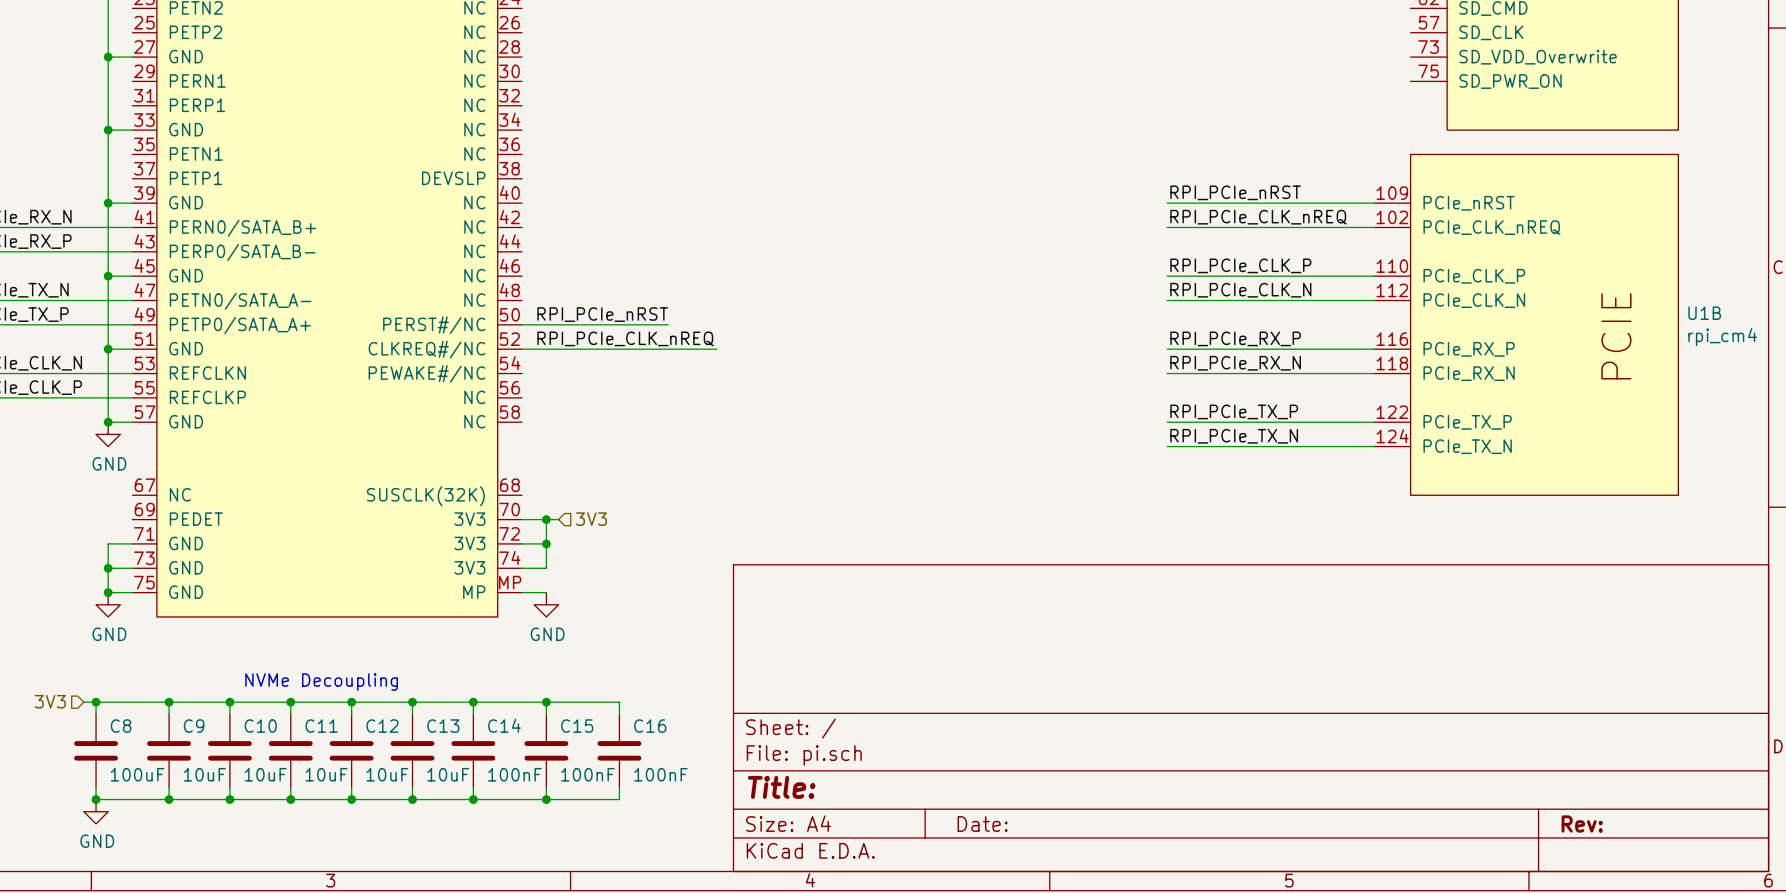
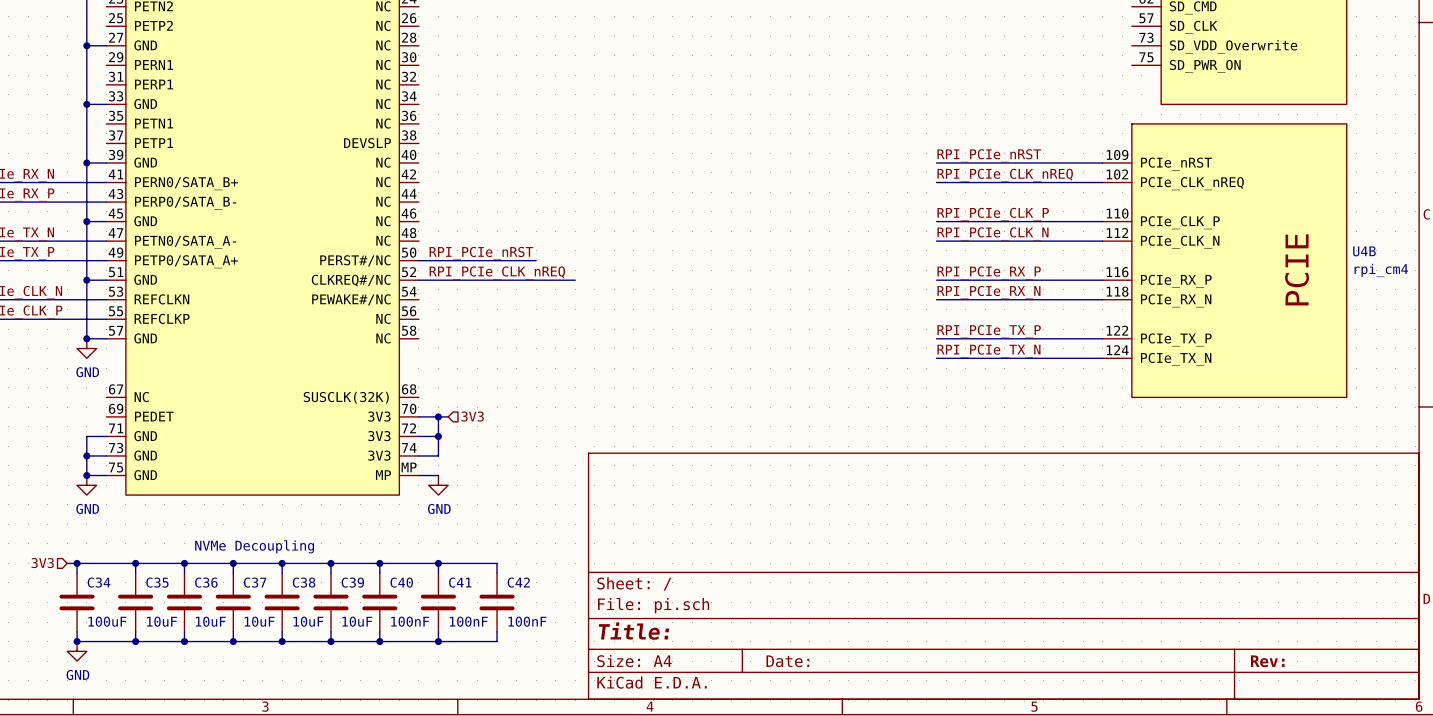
U1B name: U1B (1704, 313) -> U4B (1364, 251)
C14 name: C14 (504, 725) -> C40 (401, 582)
C8 name: C8 (121, 726) -> C34 (99, 582)
C9 name: C9 (194, 726) -> C35 (157, 582)
C10 name: C10 (260, 726) -> C36 (206, 582)
C11 name: C11 (321, 726) -> C37 (255, 582)
C12 name: C12 (382, 726) -> C38 (304, 582)
C13 name: C13 (443, 726) -> C39 (352, 582)
C15 name: C15 (577, 726) -> C41 (460, 582)
C16 name: C16 (650, 726) -> C42 (518, 582)

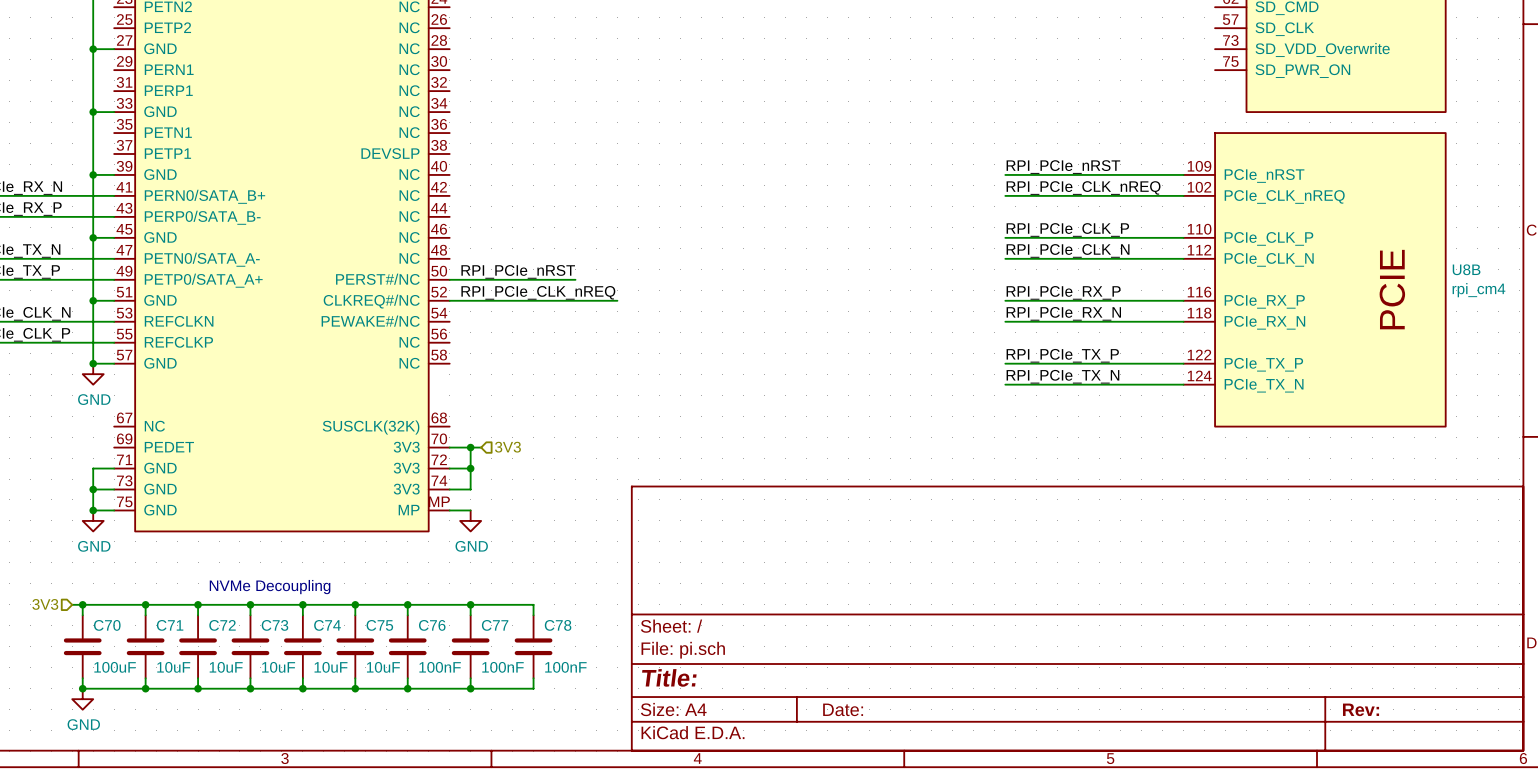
U4B name: U4B (1364, 251) -> U8B (1466, 269)
C34 name: C34 (99, 582) -> C70 (107, 625)
C35 name: C35 (157, 582) -> C71 (170, 625)
C36 name: C36 (206, 582) -> C72 (222, 625)
C37 name: C37 (255, 582) -> C73 (274, 625)
C38 name: C38 (304, 582) -> C74 (327, 625)
C39 name: C39 (352, 582) -> C75 (379, 625)
C40 name: C40 (401, 582) -> C76 (432, 625)
C41 name: C41 (460, 582) -> C77 (495, 625)
C42 name: C42 (518, 582) -> C78 (558, 625)

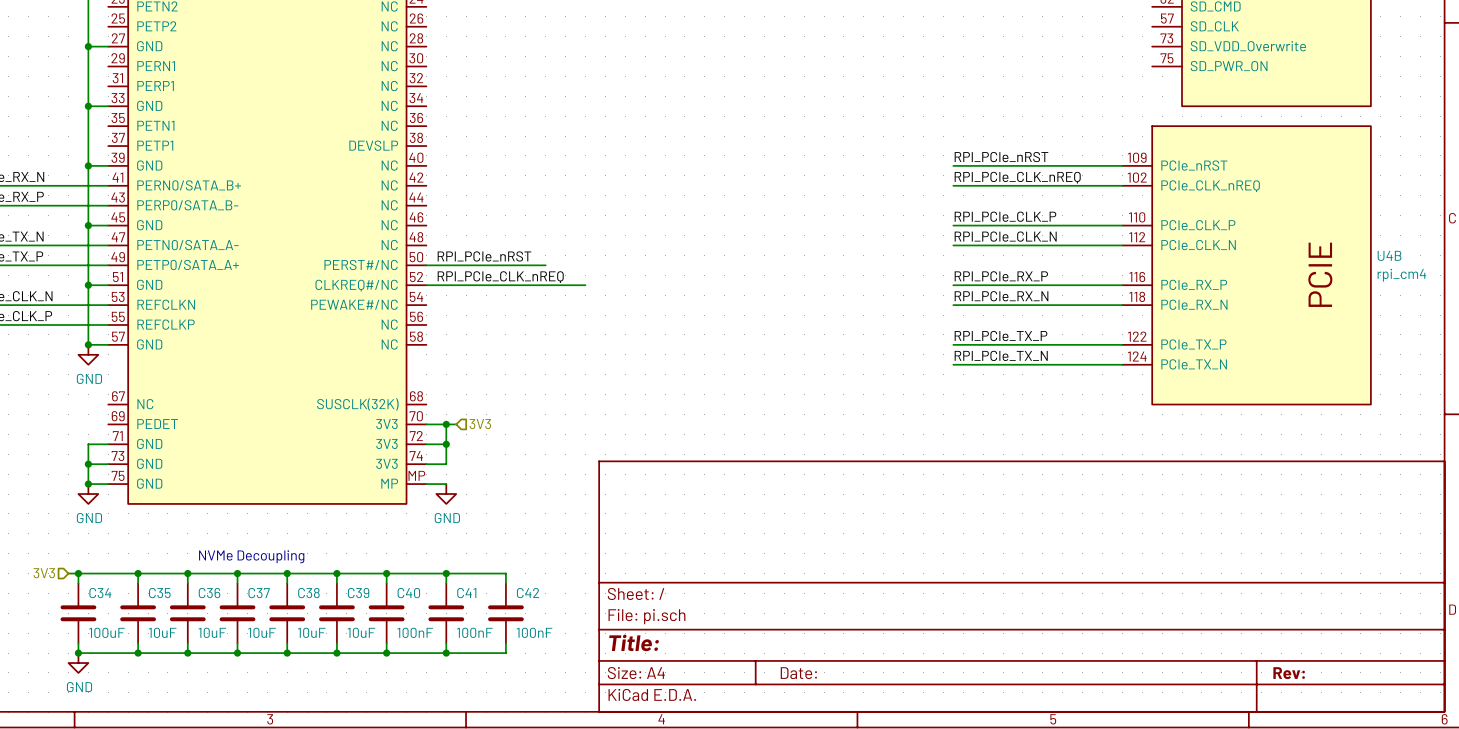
U8B name: U8B (1466, 269) -> U4B (1389, 255)
C70 name: C70 (107, 625) -> C34 (100, 593)
C71 name: C71 (170, 625) -> C35 (159, 593)
C72 name: C72 (222, 625) -> C36 (209, 593)
C73 name: C73 (274, 625) -> C37 (259, 593)
C74 name: C74 (327, 625) -> C38 (308, 593)
C75 name: C75 (379, 625) -> C39 (358, 593)
C76 name: C76 (432, 625) -> C40 (408, 593)
C77 name: C77 (495, 625) -> C41 (466, 593)
C78 name: C78 (558, 625) -> C42 (528, 593)

